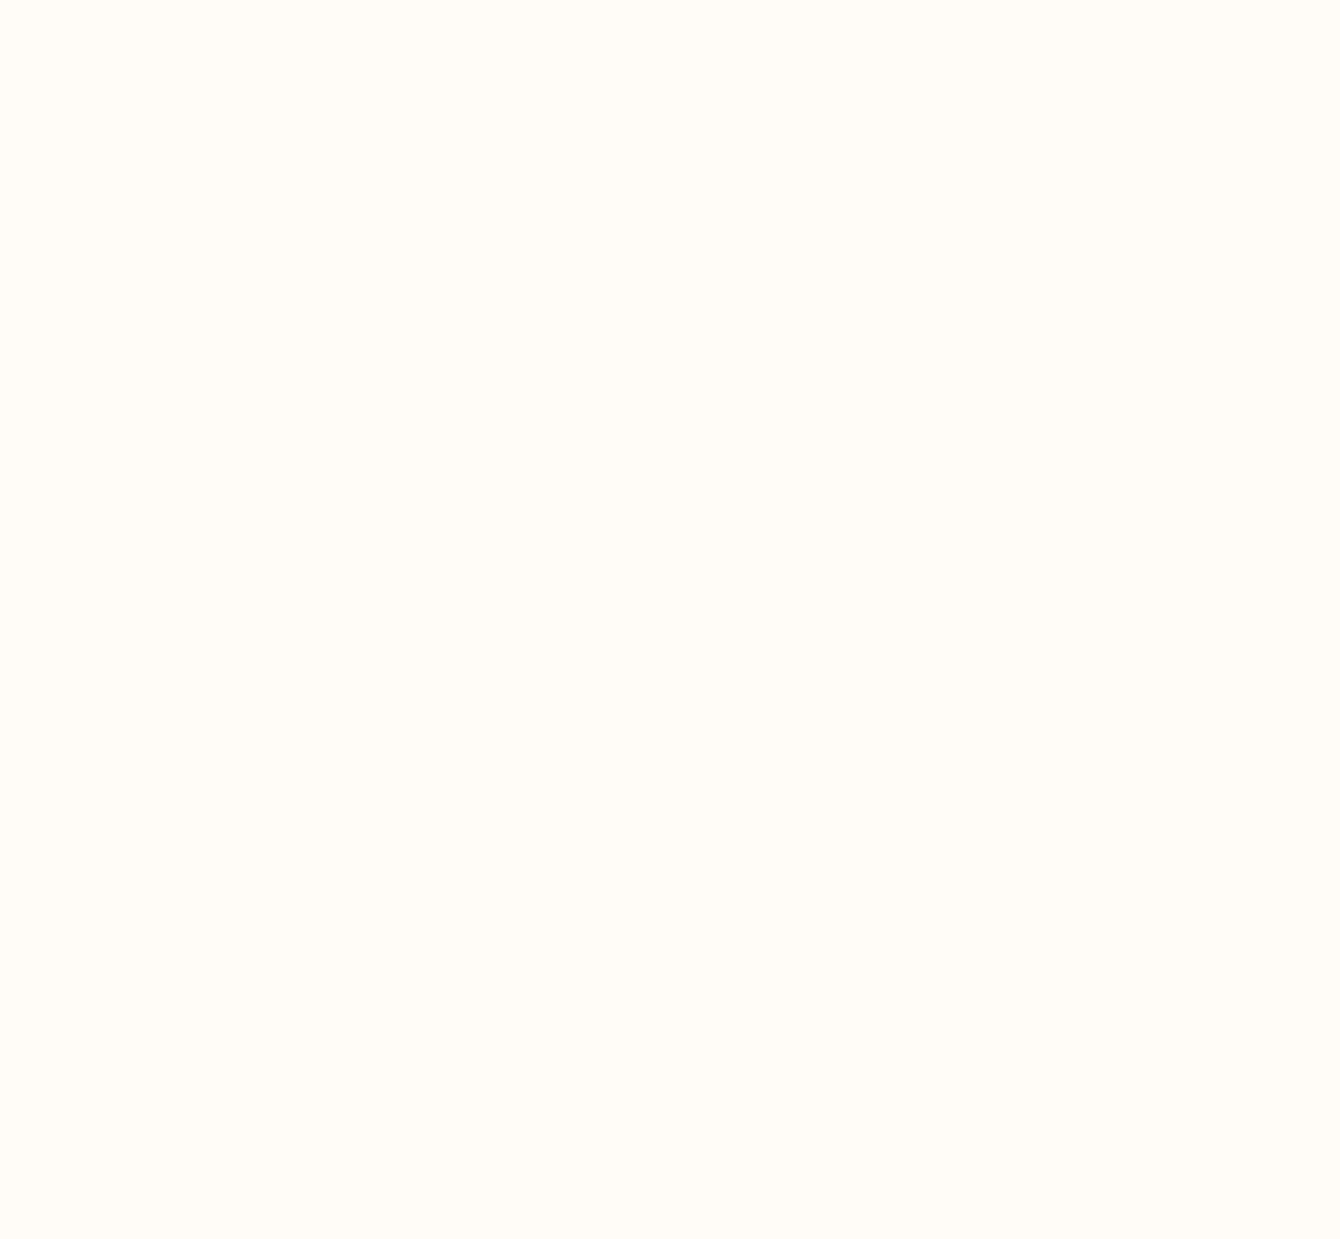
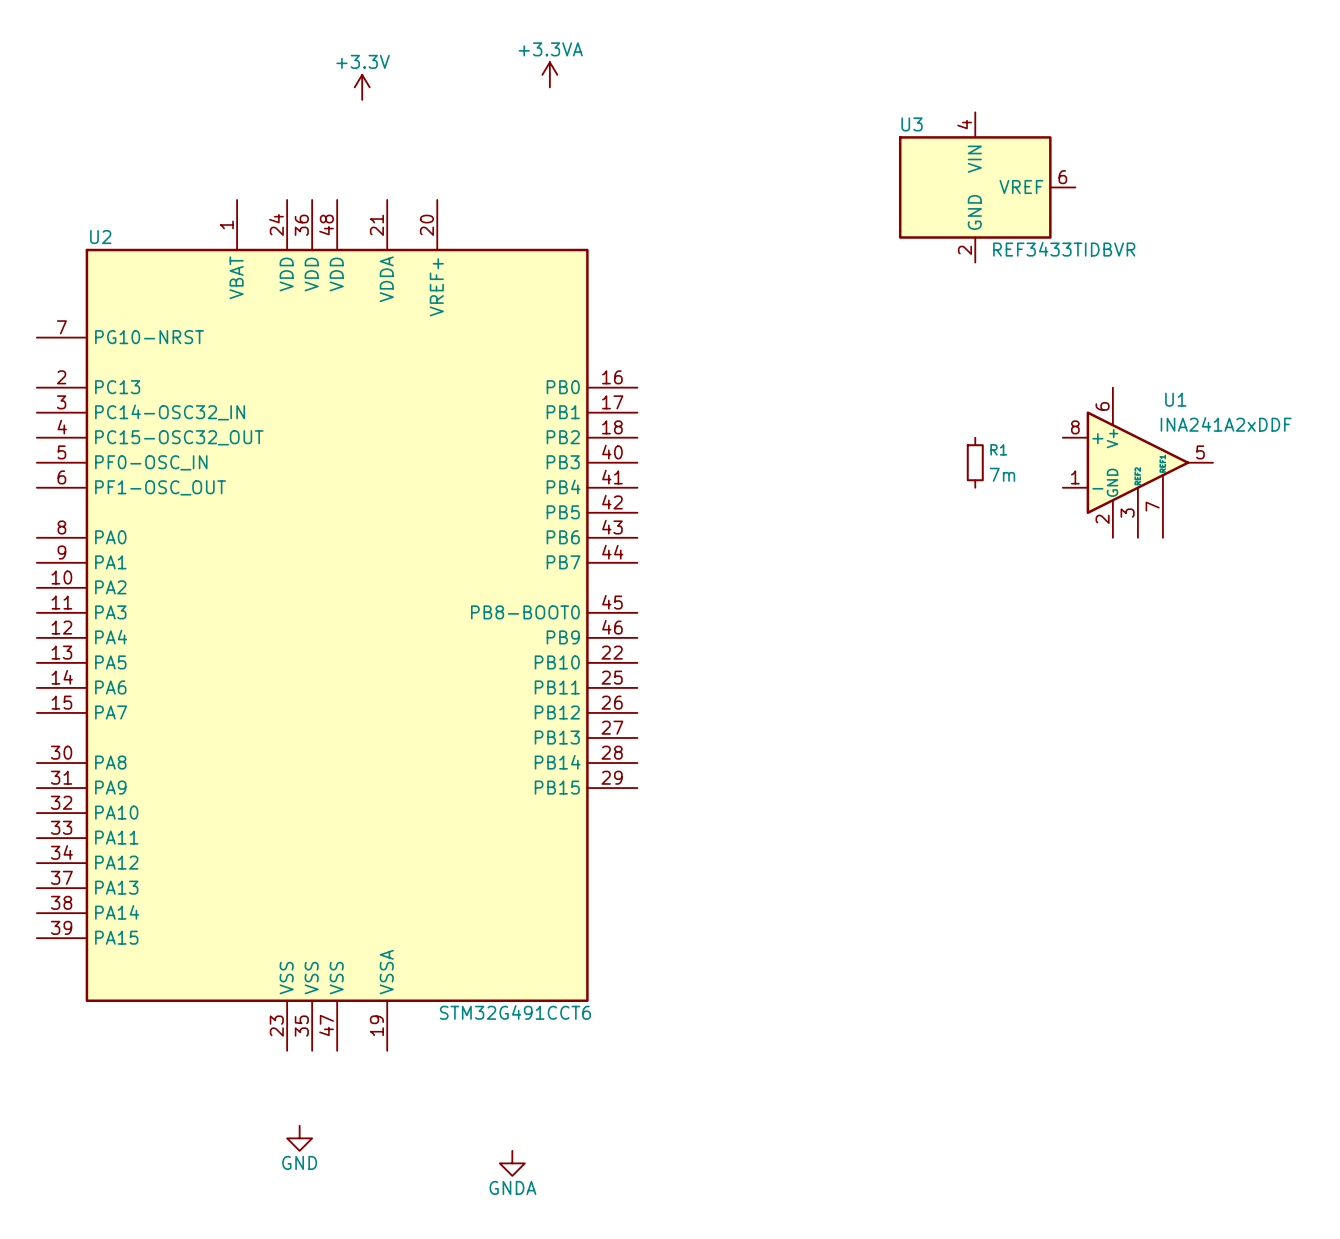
power symbol: none -> +3.3VA (549, 74)
power symbol: none -> +3.3V (362, 87)
U3: none -> REF3433TIDBVR (987, 187)
R1: none -> 7m (975, 462)
U1: none -> INA241A2xDDF (1137, 462)
U2: none -> STM32G491CCT6 (337, 625)
power symbol: none -> GND (299, 1138)
power symbol: none -> GNDA (512, 1163)

